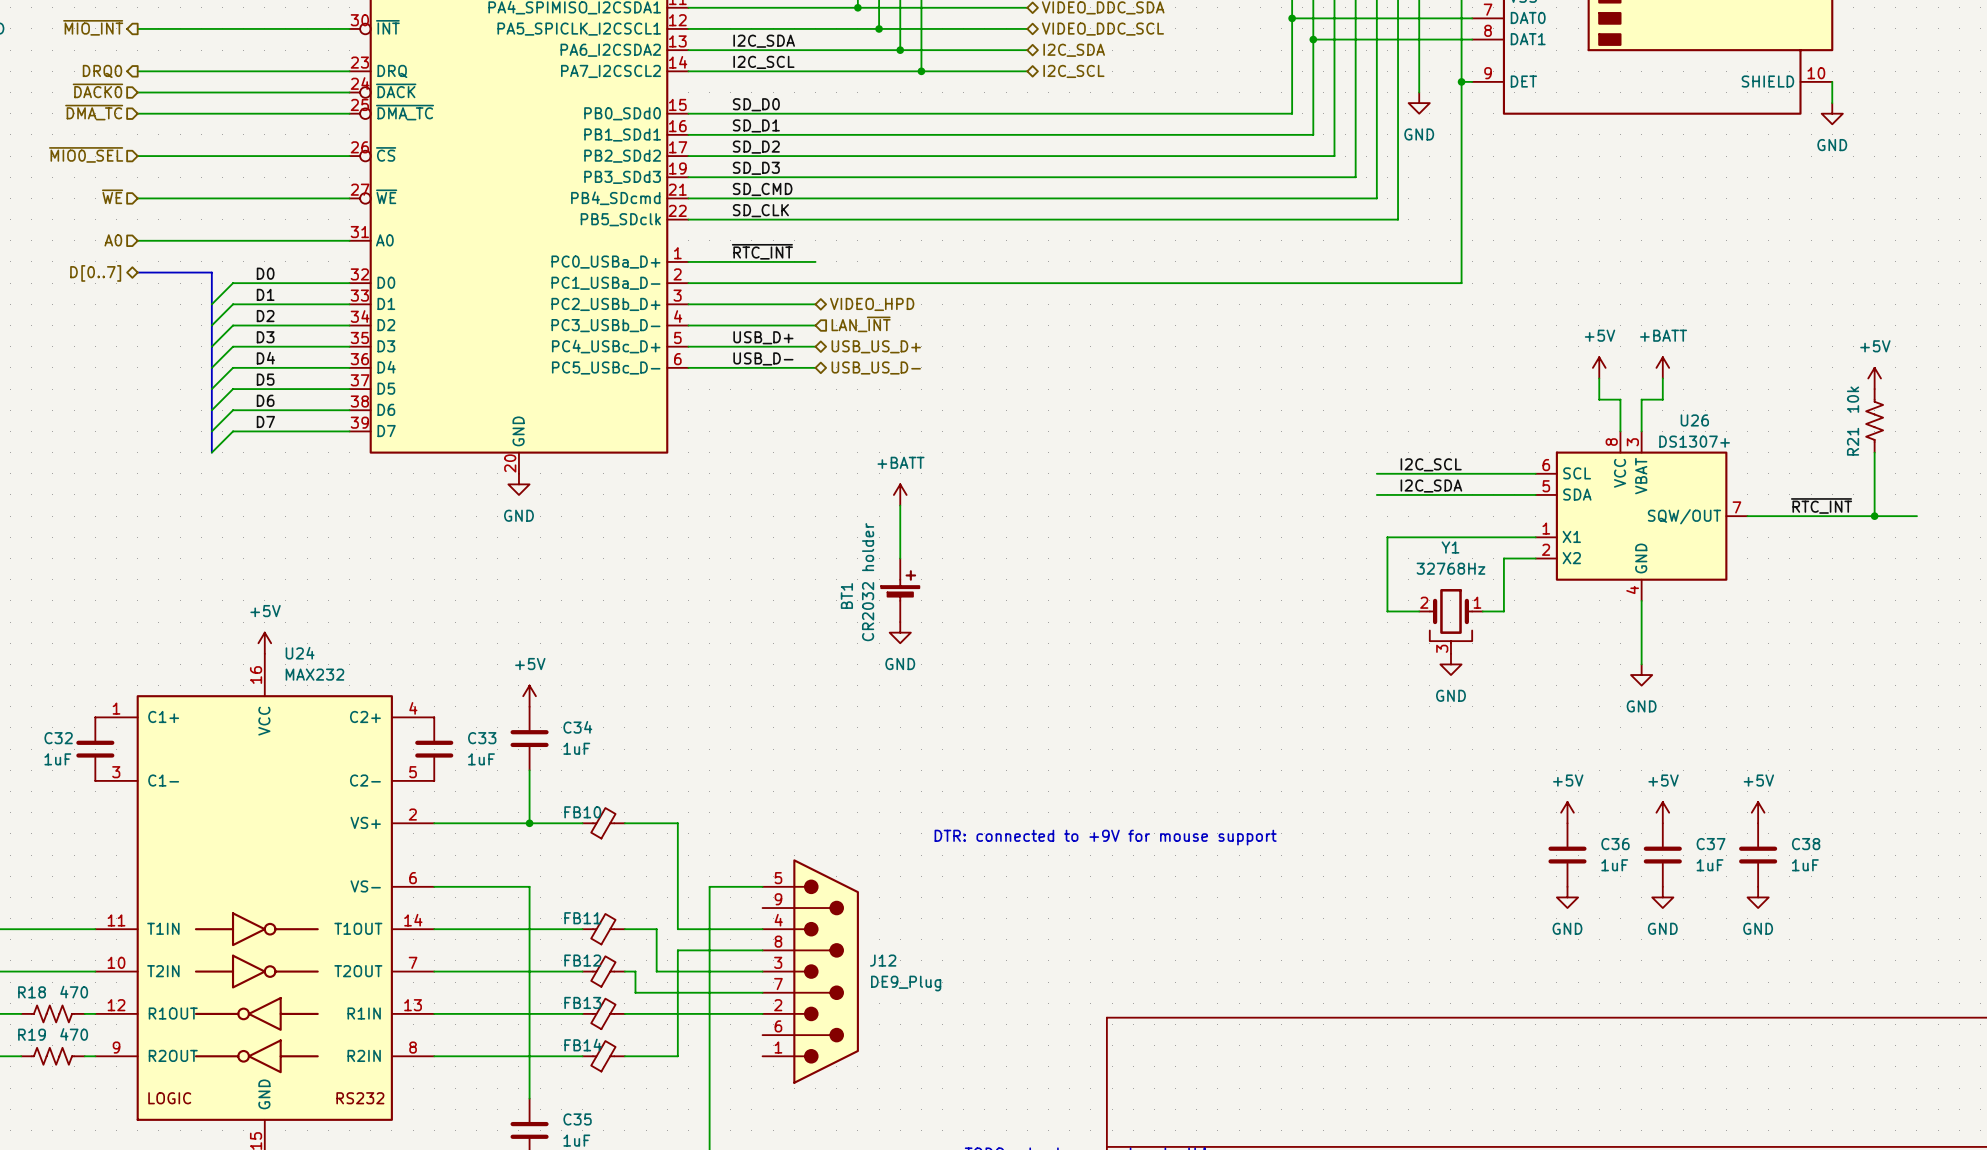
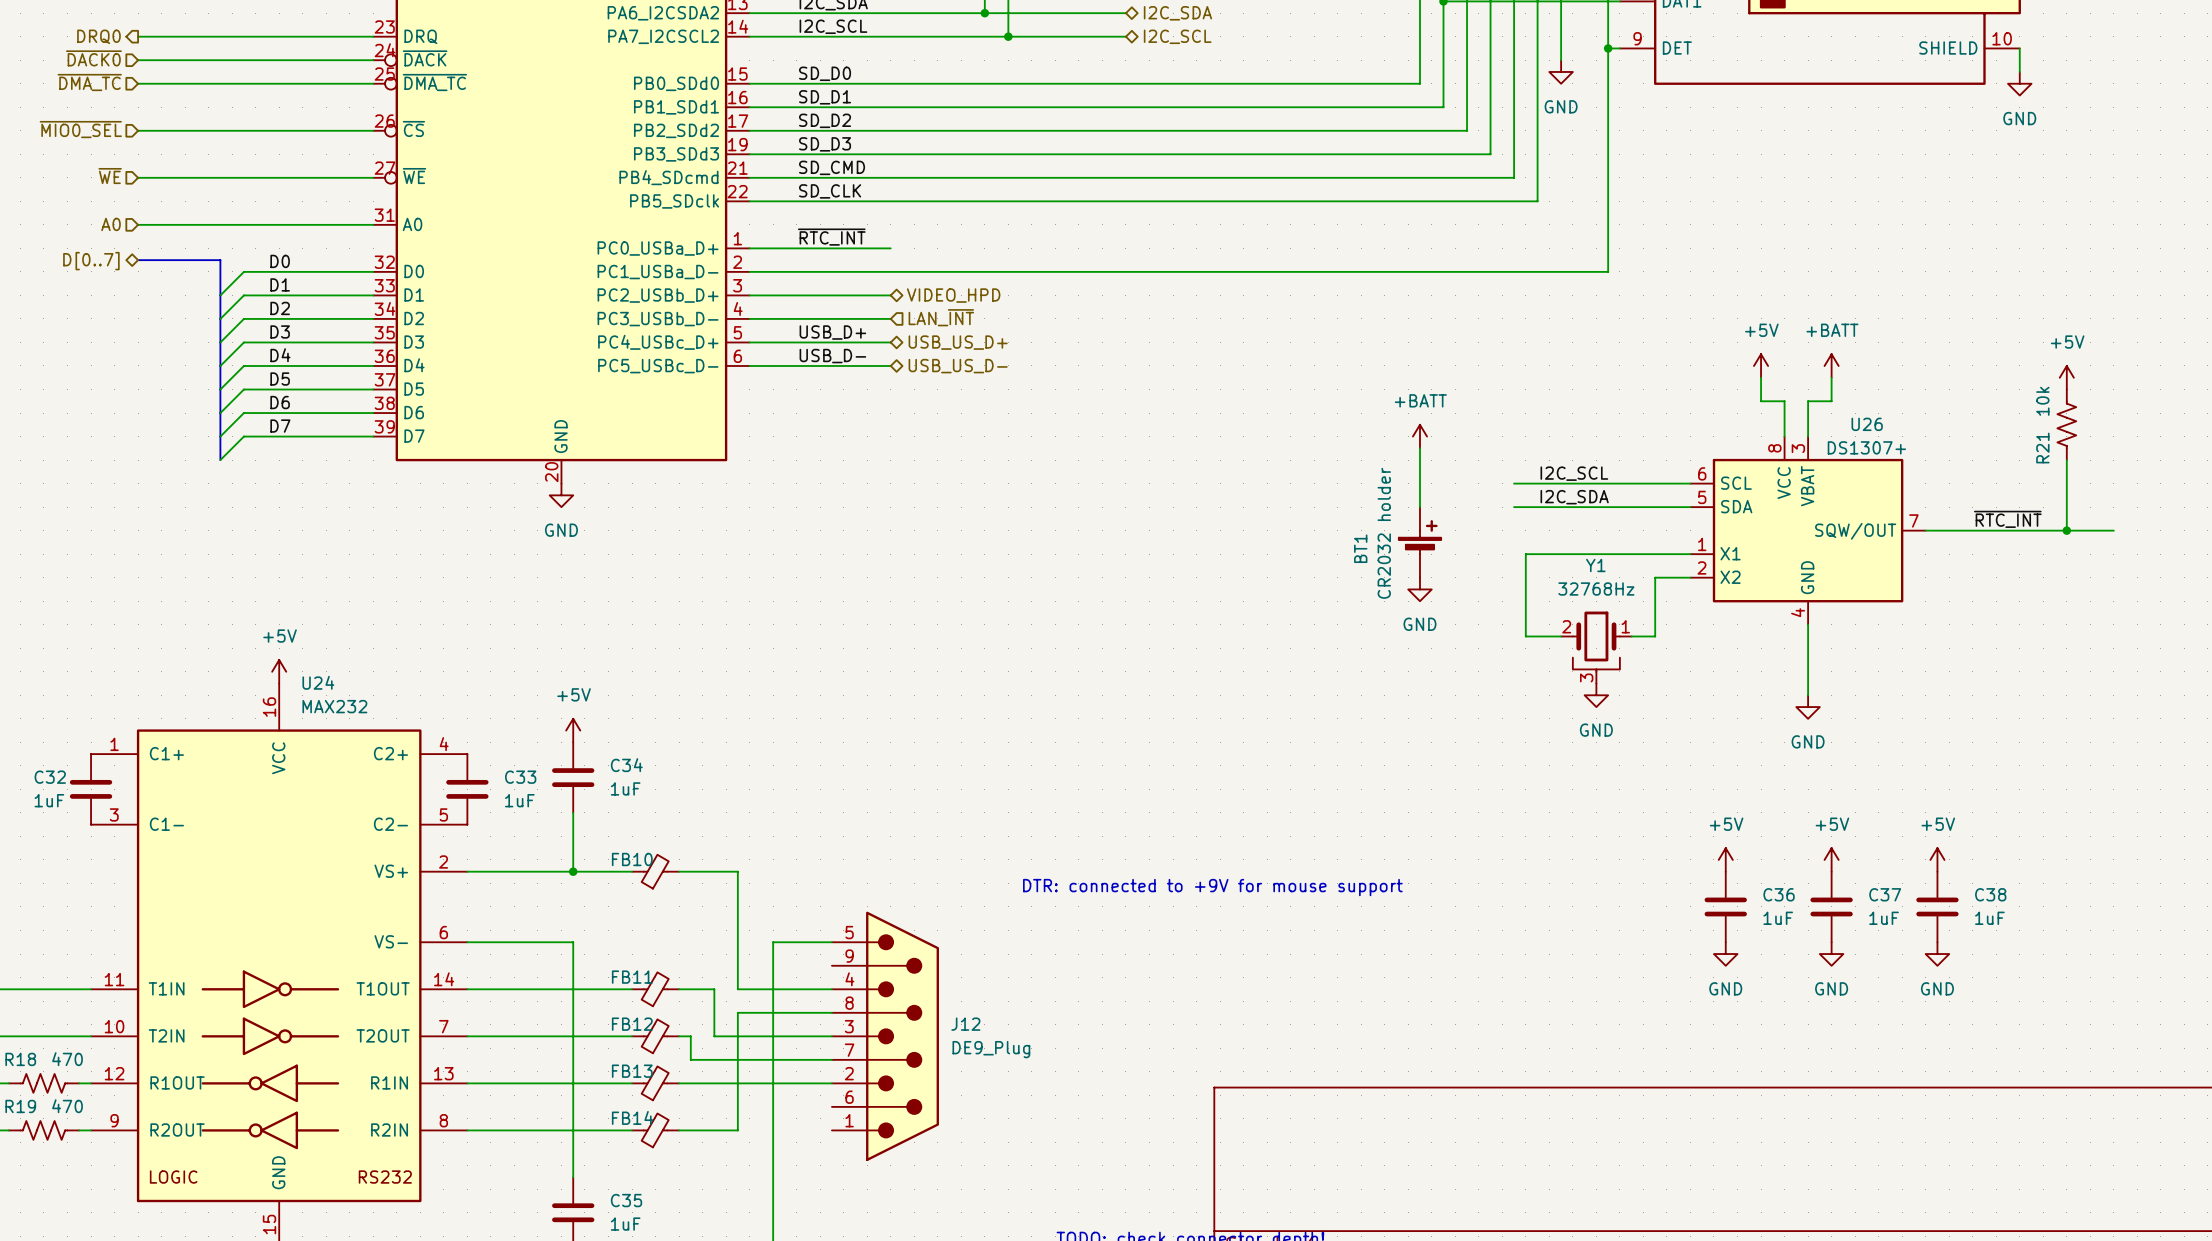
power symbol: none -> +BATT (1419, 436)
wire: none -> (1419, 448) (1419, 507)
power symbol: +BATT (900, 494) -> none
wire: (900, 505) (900, 558) -> none
power symbol: none -> GND (1419, 589)
BT1 position: (900, 590) -> (1419, 542)
power symbol: GND (900, 632) -> none

